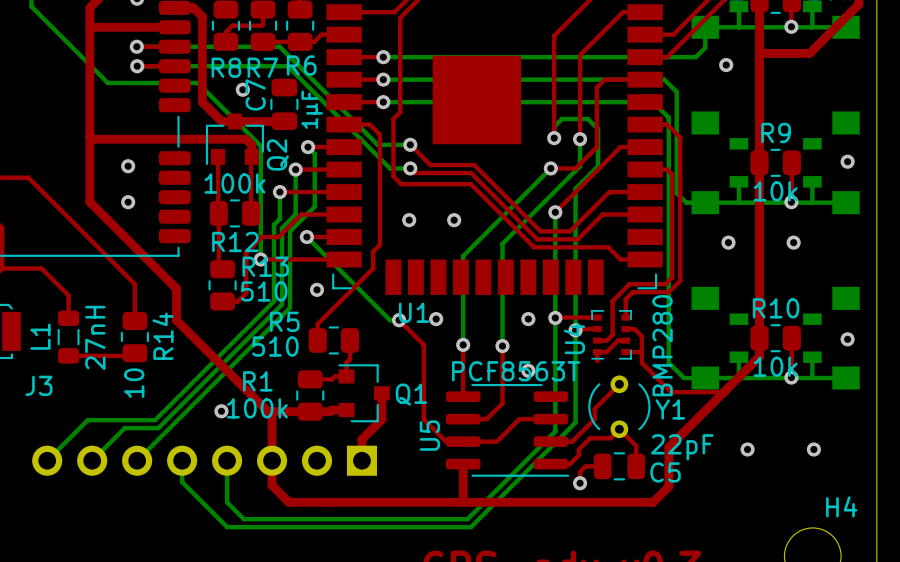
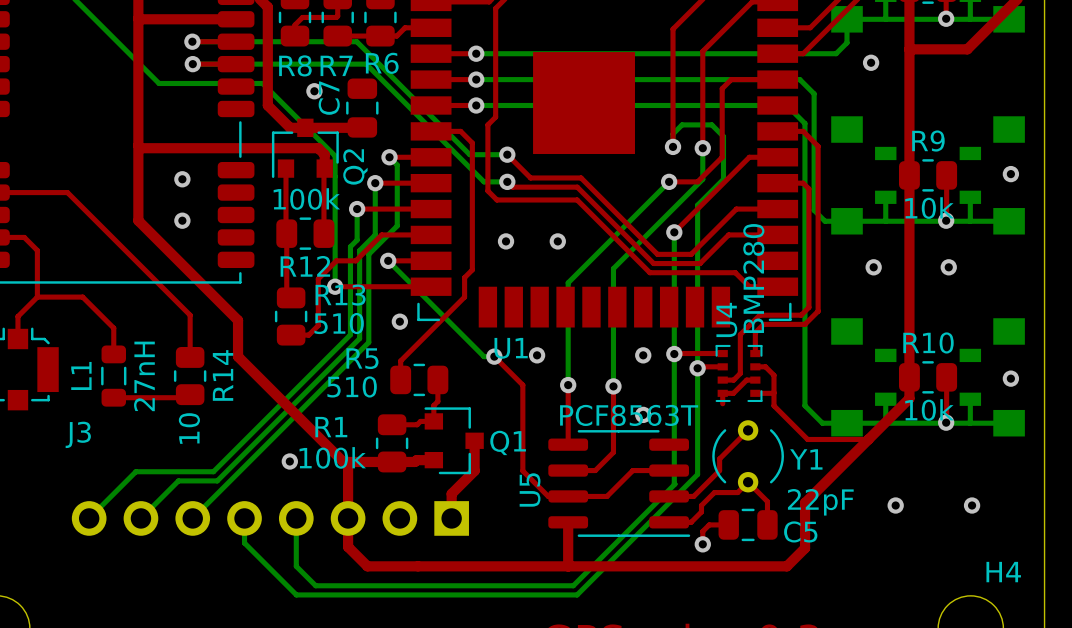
C7 value: 1μF (312, 109) -> none
U4 name position: U4 (574, 338) -> U4 (726, 319)
U4 value position: BMP280 (662, 345) -> BMP280 (753, 278)

